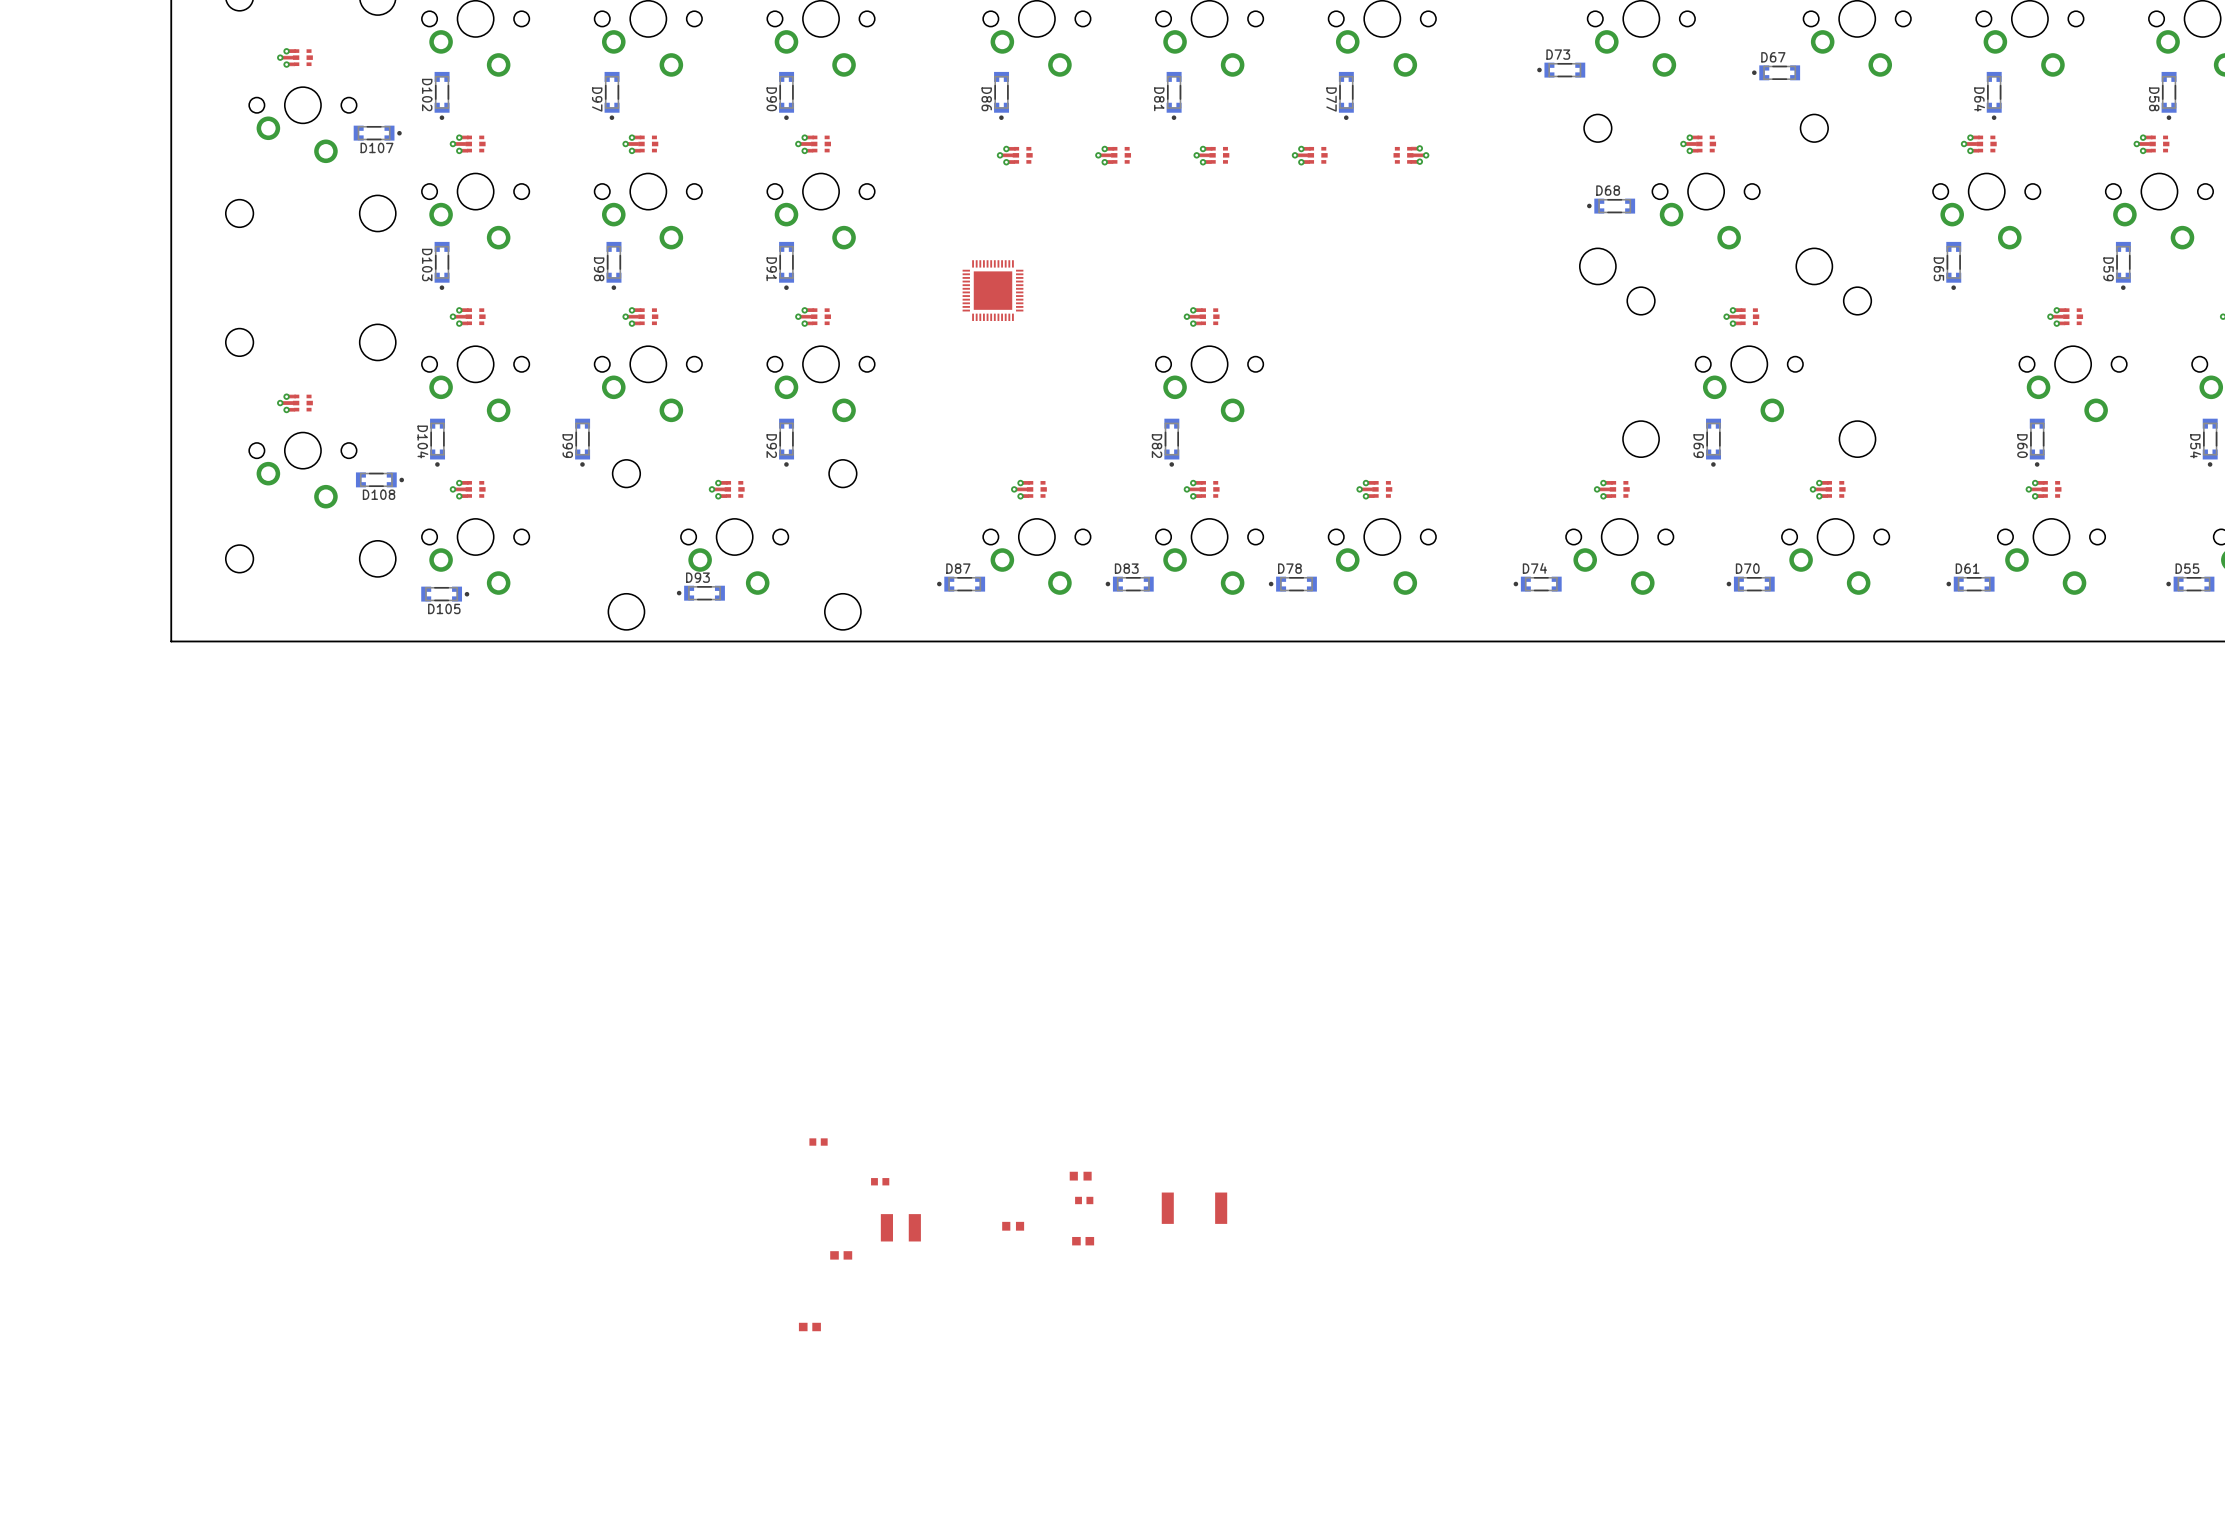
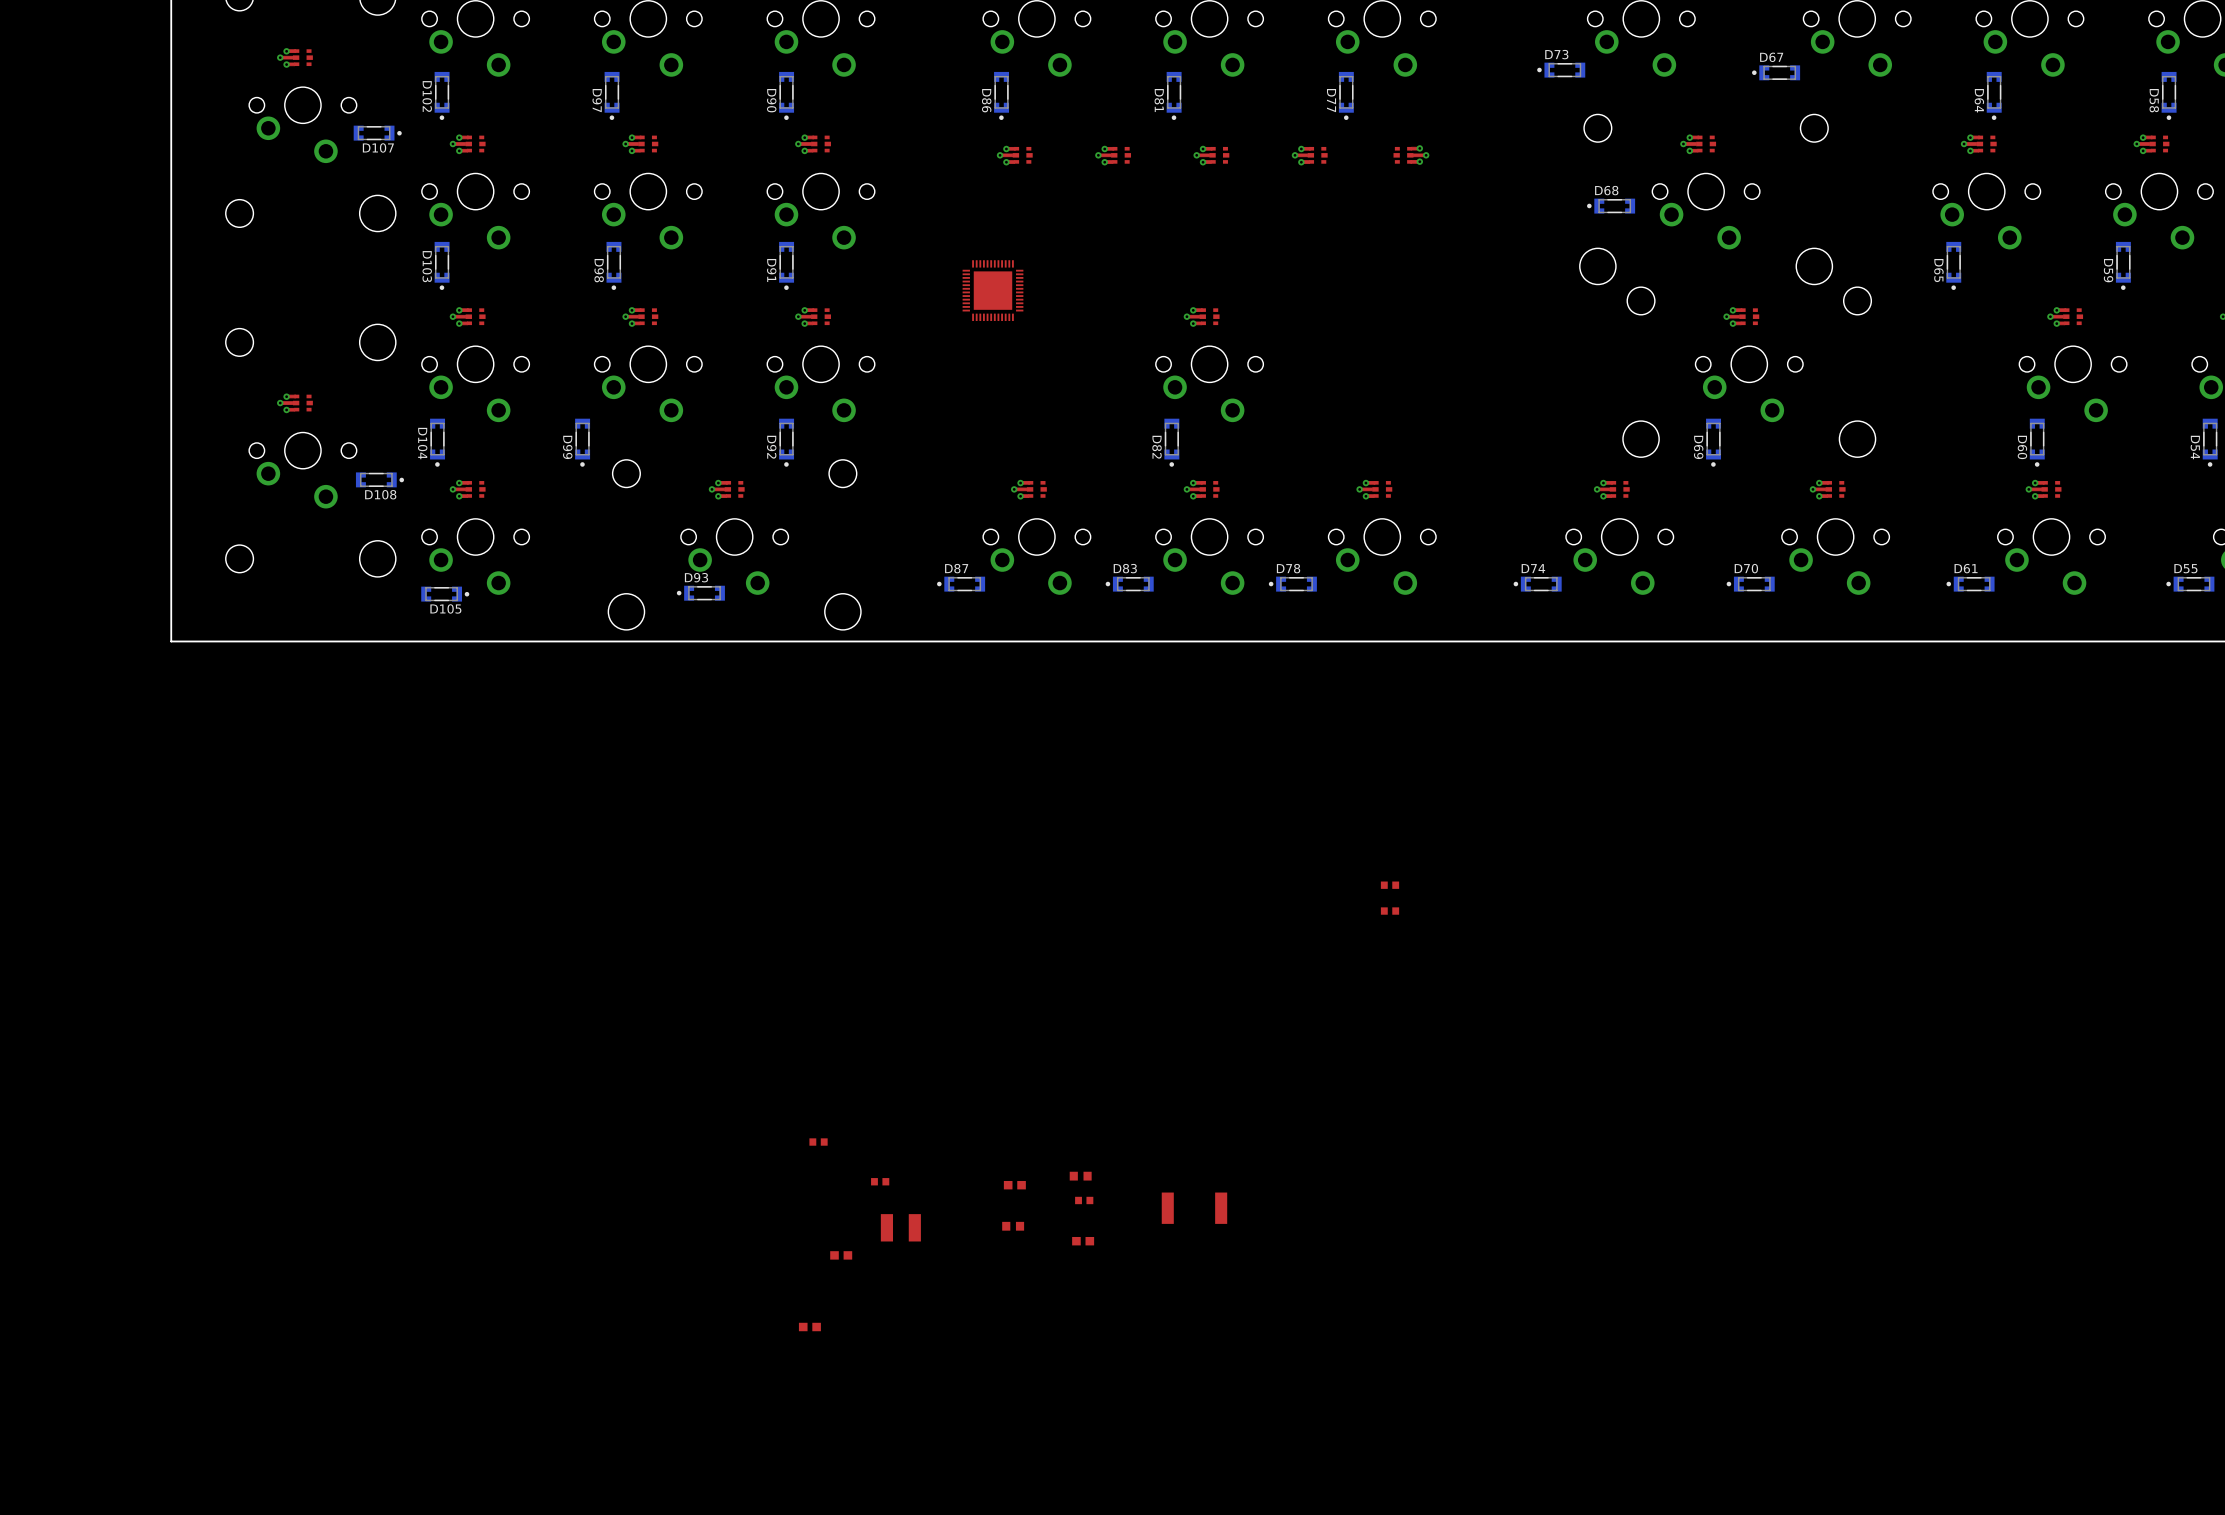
part: none -> (1390, 885)
part: none -> (1390, 911)
part: none -> (1014, 1185)

